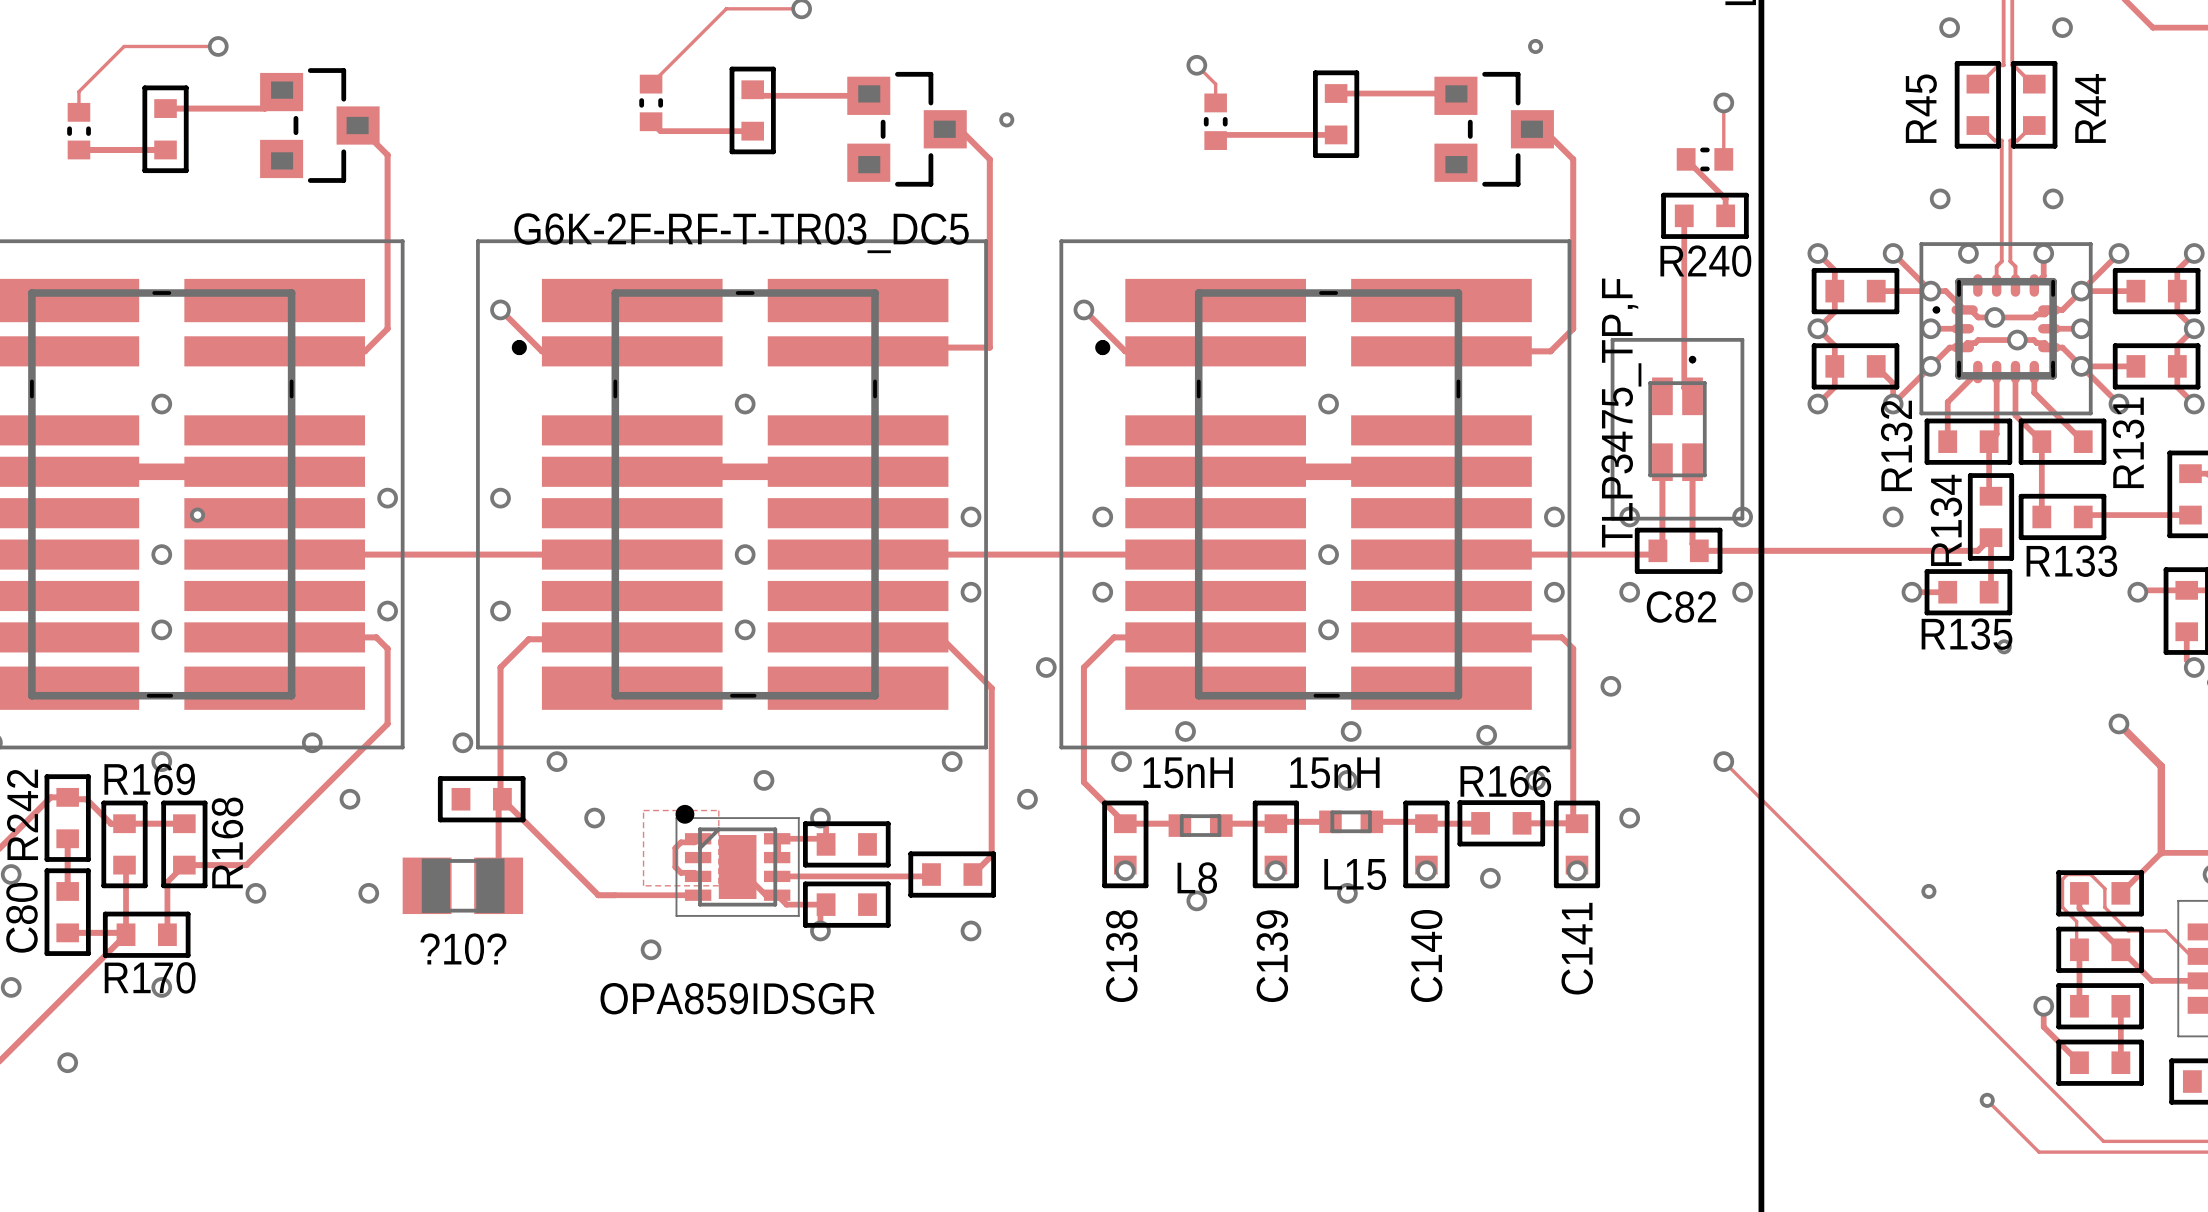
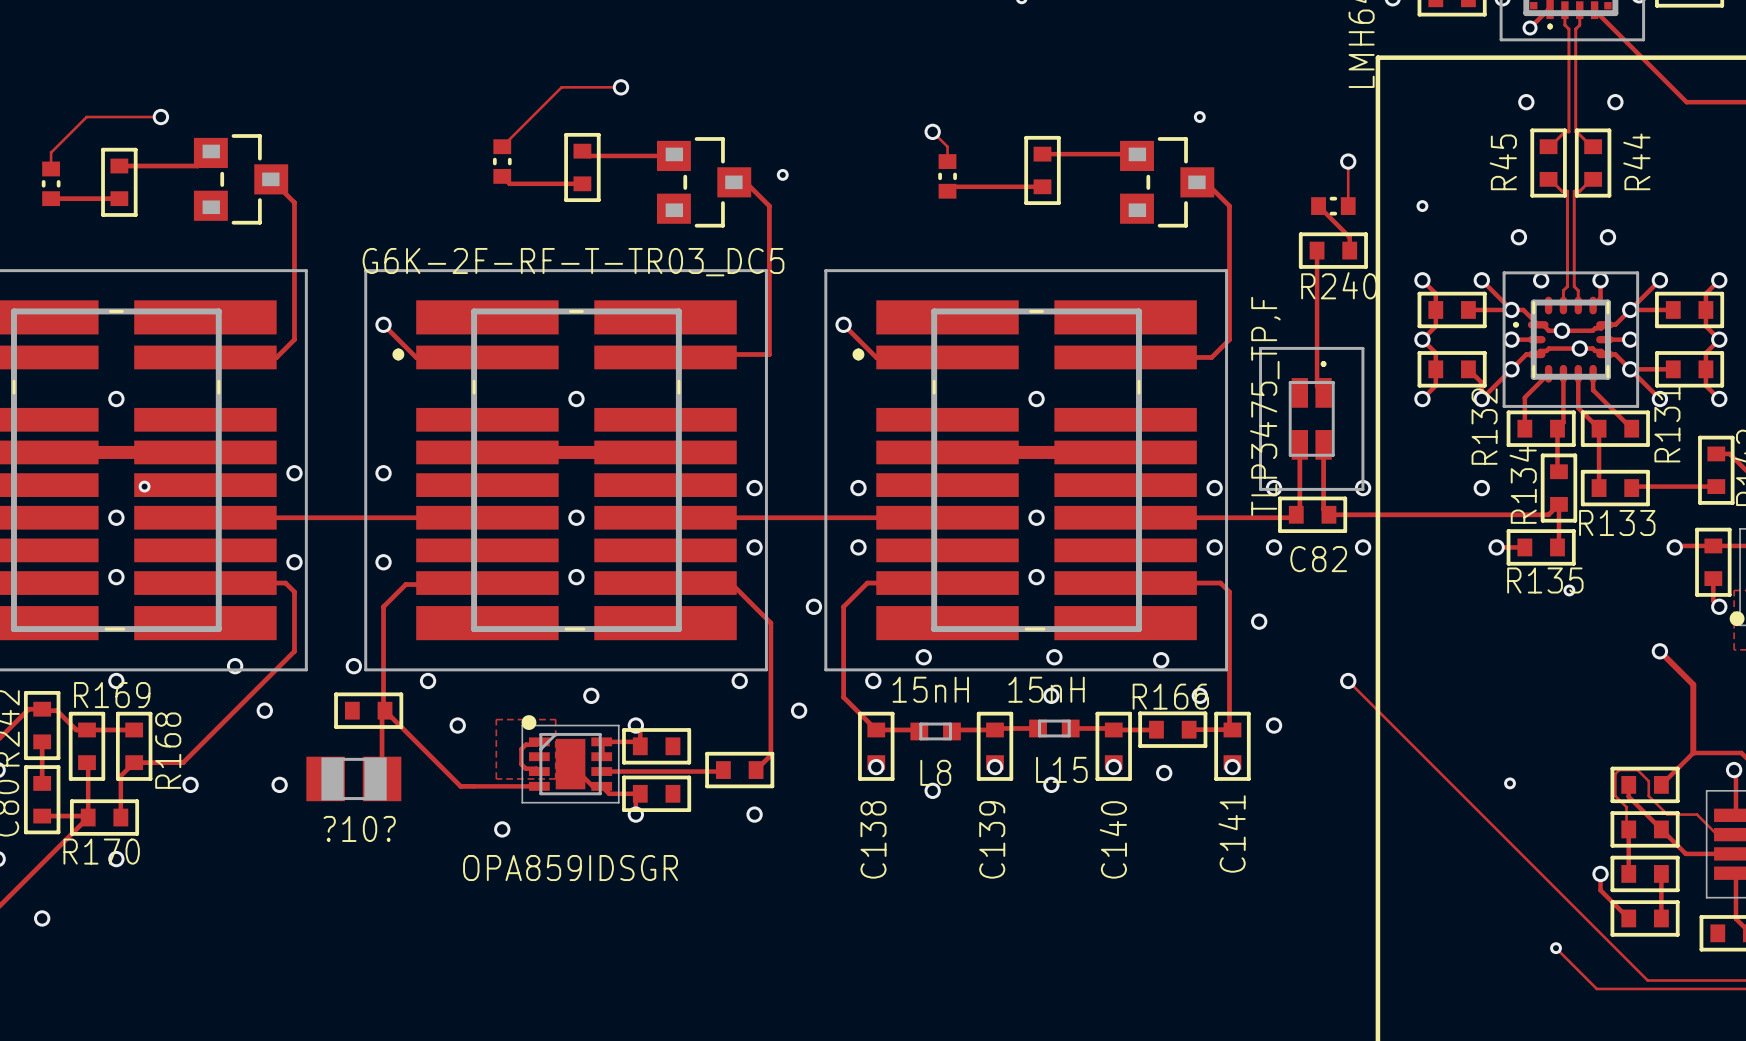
via: none -> (1422, 206)

